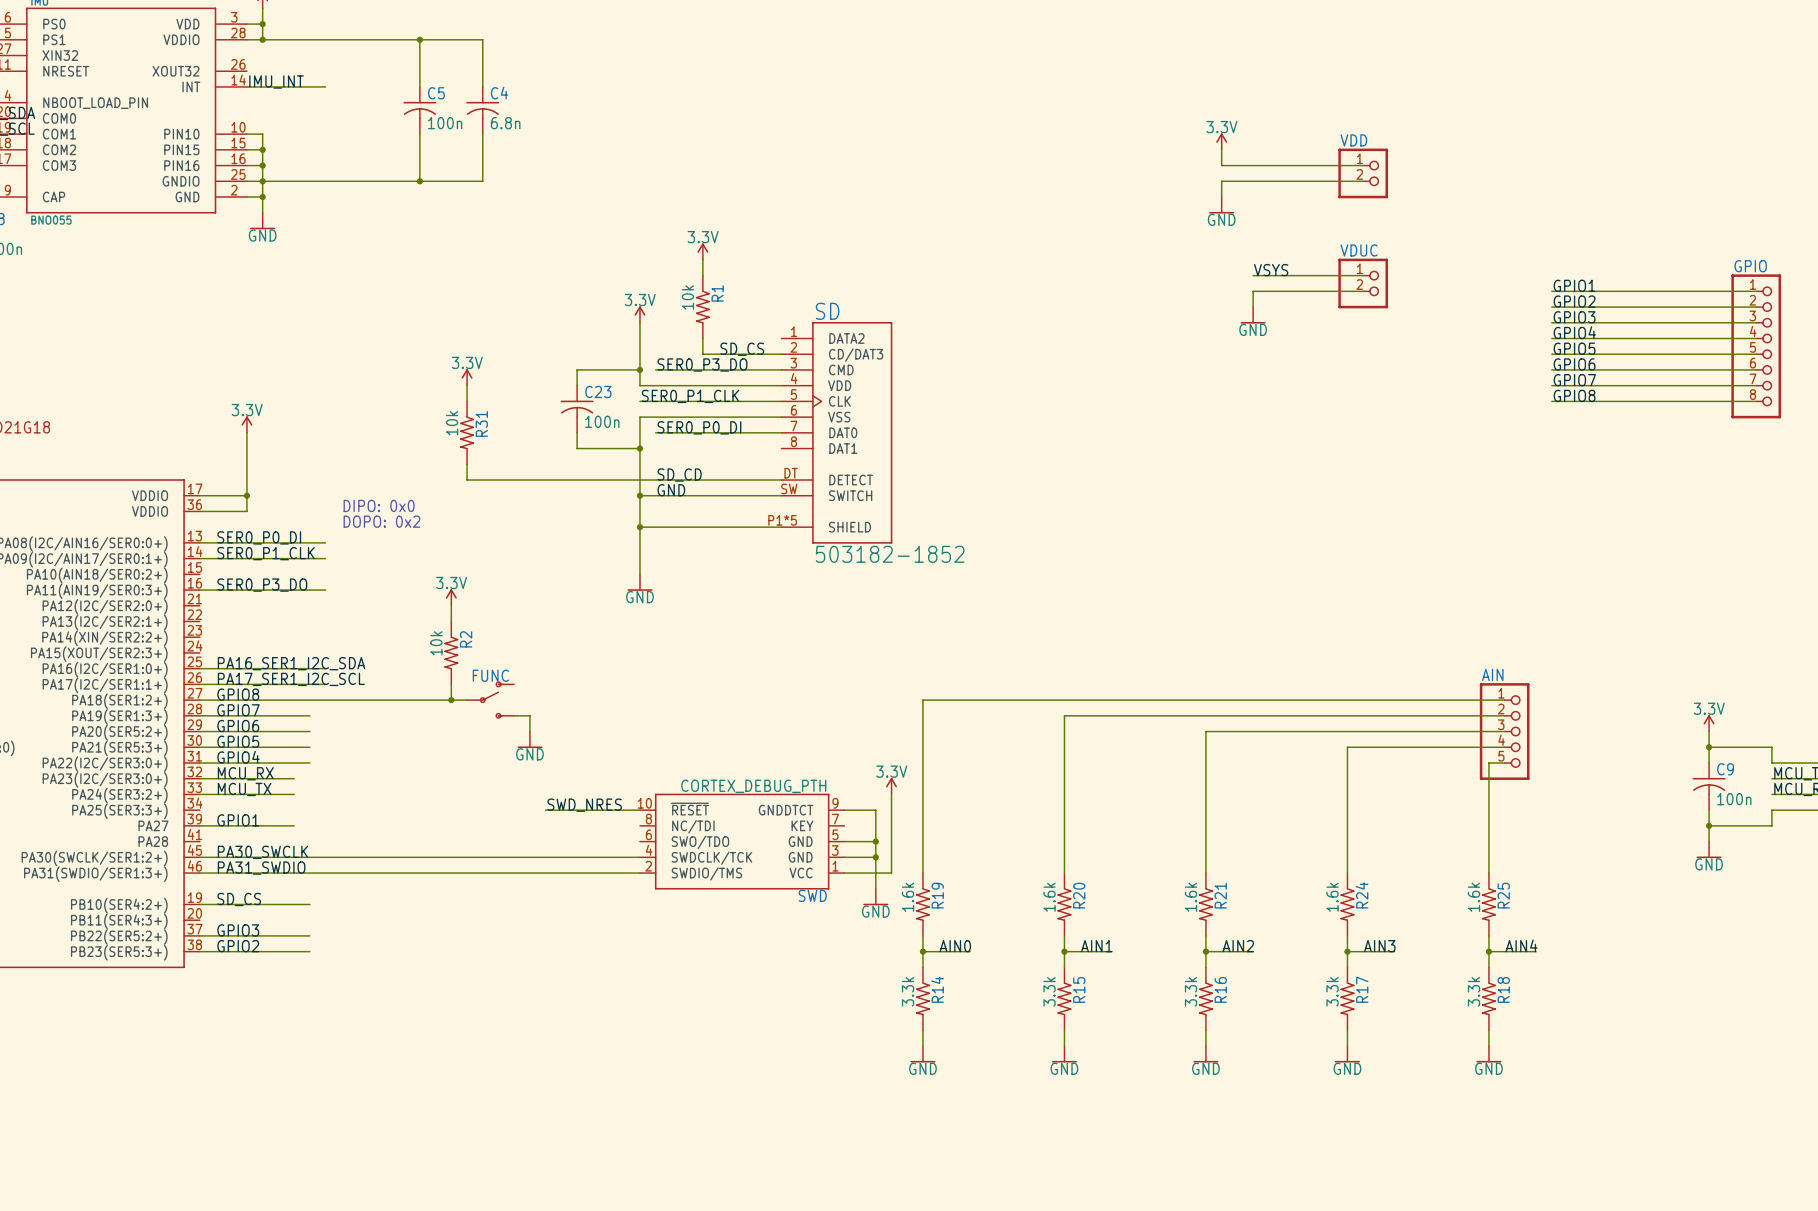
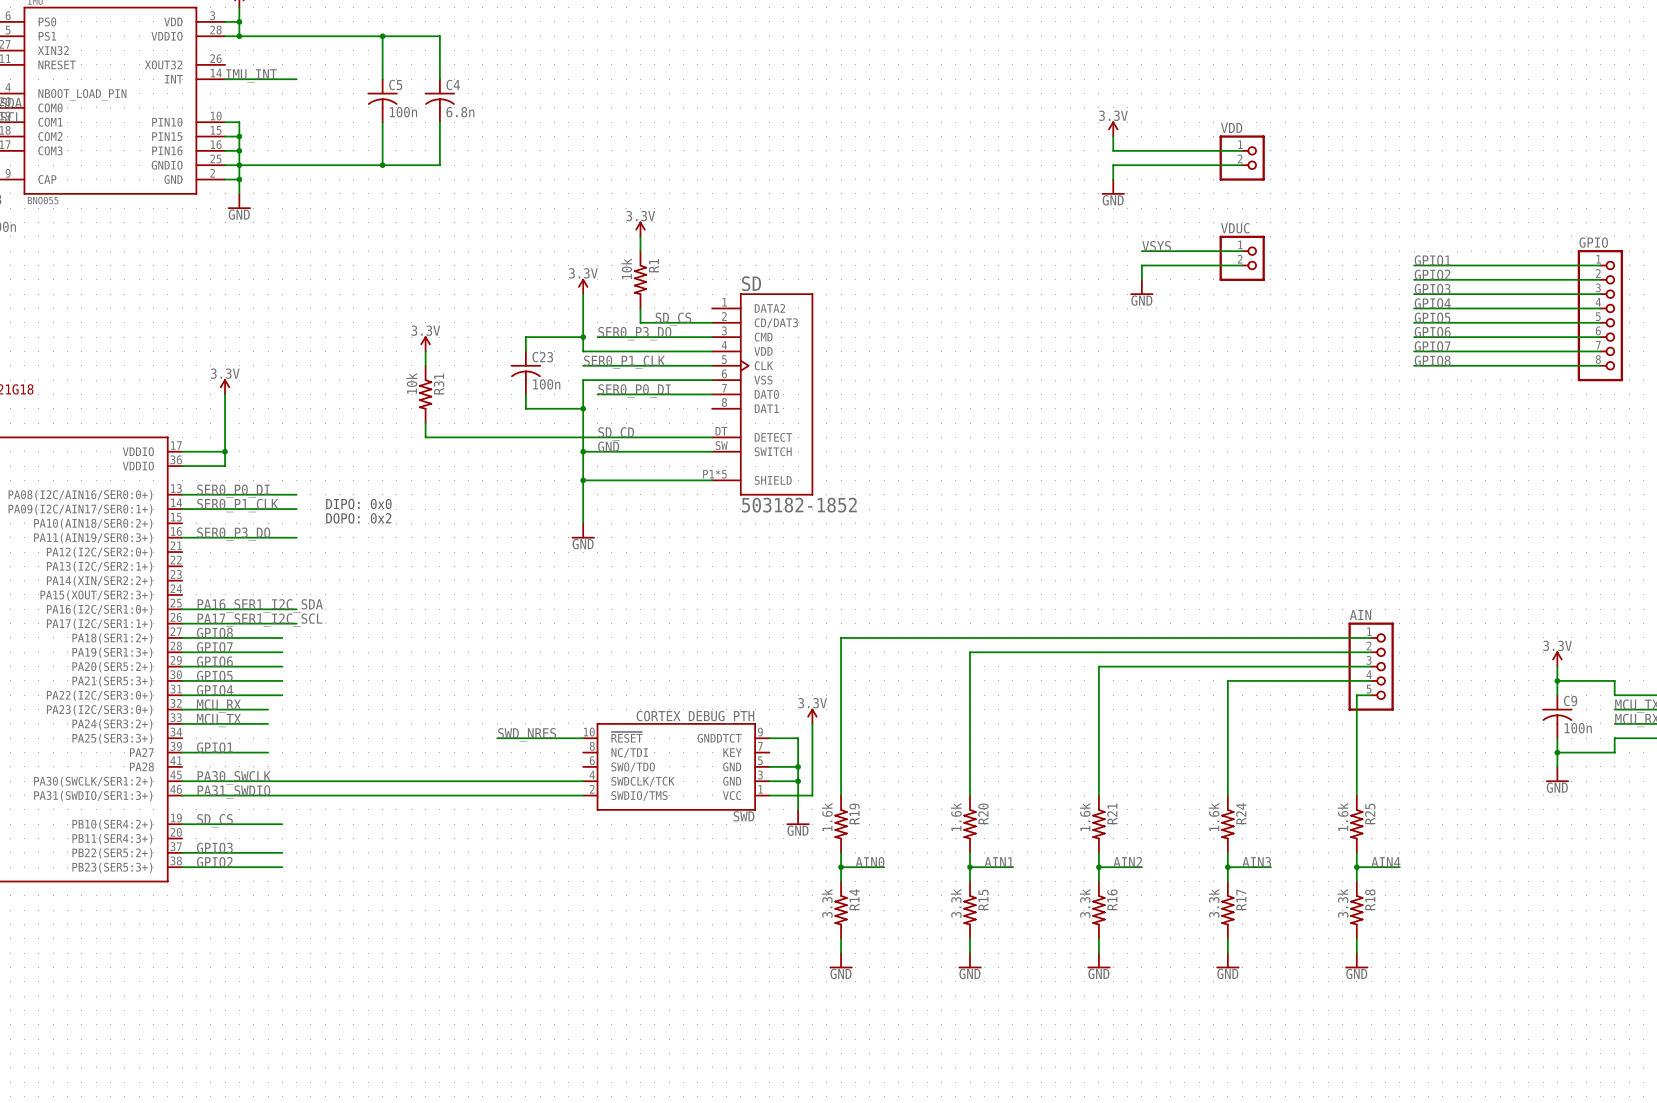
text position: DIPO: 0x0 (379, 505) -> DIPO: 0x0 (358, 504)
text position: DOPO: 0x2 (381, 521) -> DOPO: 0x2 (358, 518)
power symbol: 3.3V (451, 597) -> none
wire: (451, 605) (451, 621) -> none
R2: 10k (451, 652) -> none
wire: (451, 684) (451, 700) -> none
wire: (309, 700) (467, 700) -> none
junction: (451, 700) -> none
FUNC: (490, 700) -> none
wire: (514, 715) (529, 715) (529, 731) -> none
power symbol: GND (529, 739) -> none

